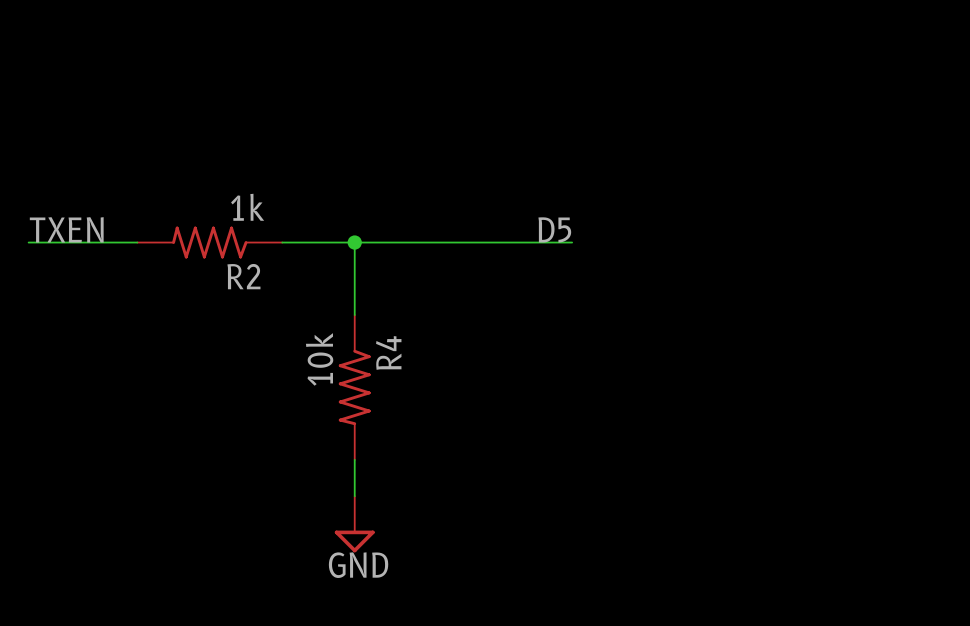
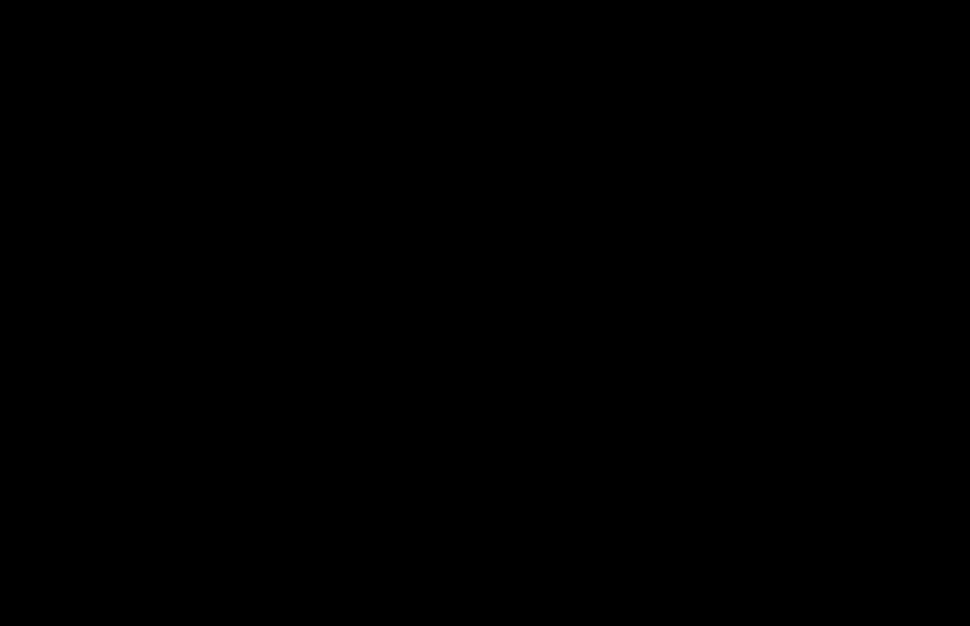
label: TXEN (66, 229) -> none
label: D5 (554, 229) -> none
wire: (28, 242) (137, 242) -> none
R2: 1k (209, 242) -> none
wire: (282, 242) (572, 242) -> none
wire: (354, 242) (354, 315) -> none
junction: (354, 242) -> none
R4: 10k (354, 387) -> none
wire: (354, 459) (354, 496) -> none
power symbol: GND (354, 524) -> none

